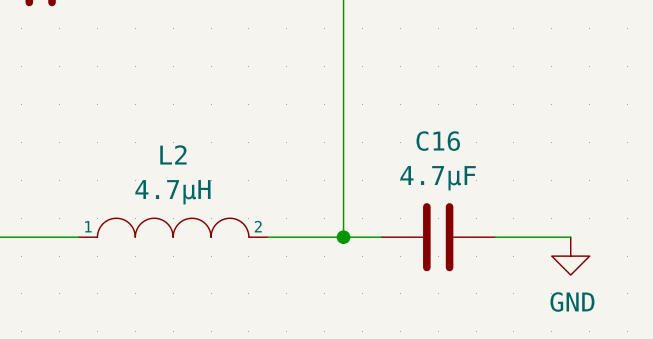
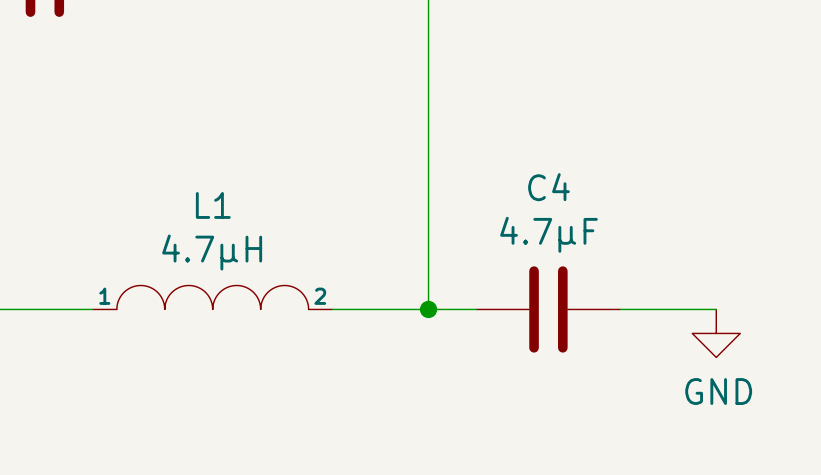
C16 name: C16 (438, 141) -> C4 (549, 187)
L2 name: L2 (173, 154) -> L1 (213, 205)

